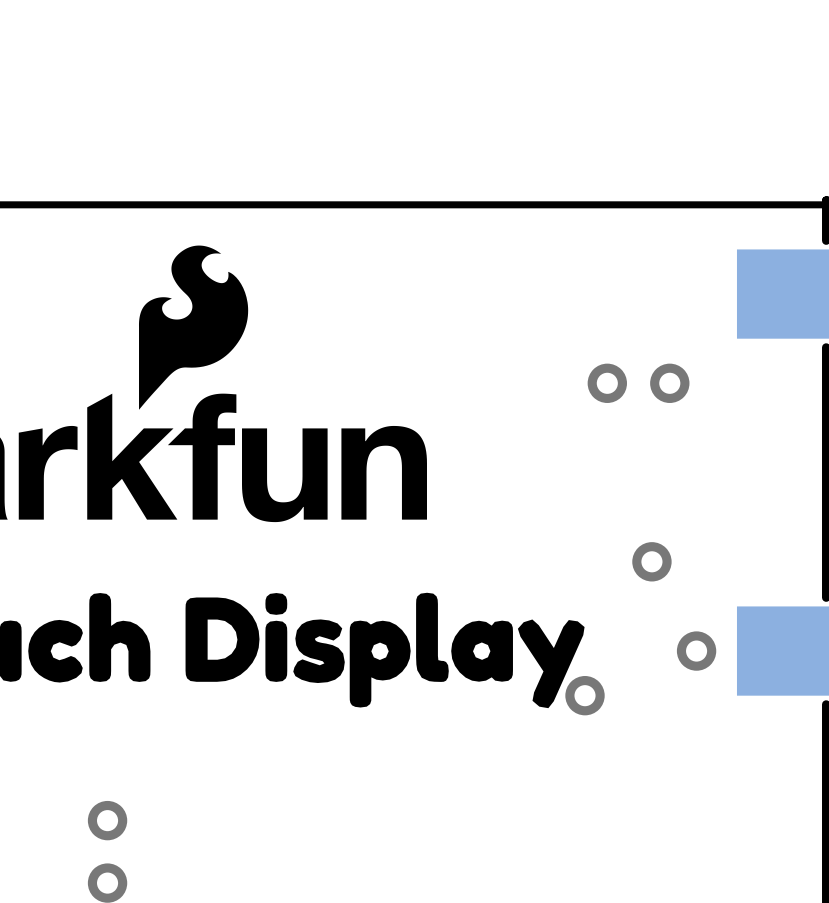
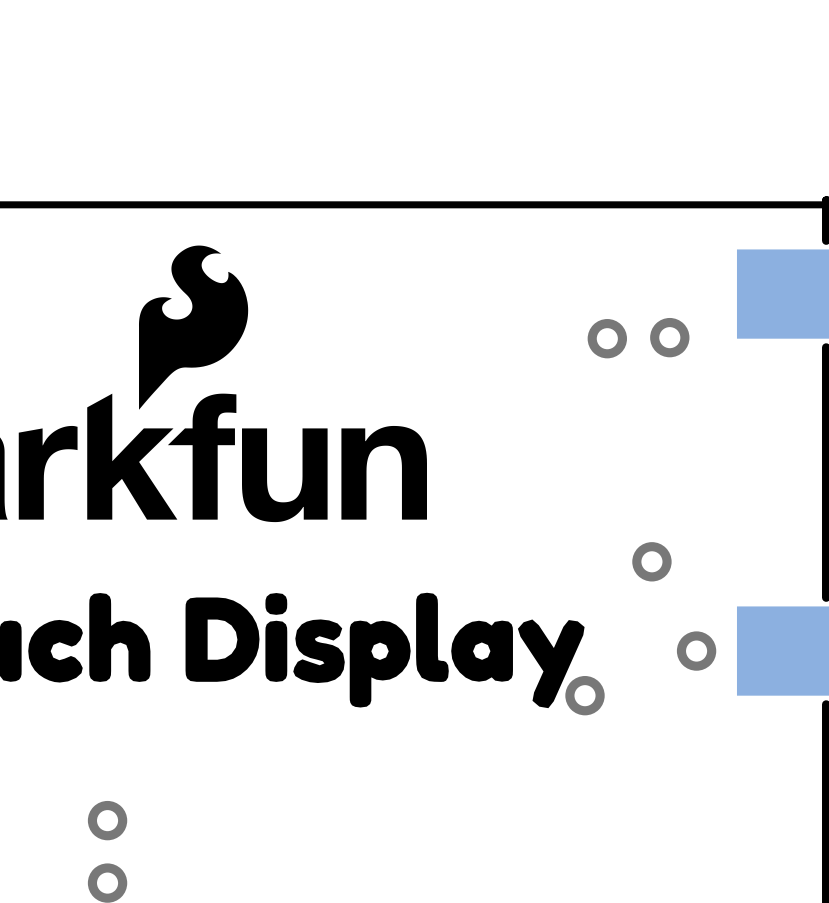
via: none -> (669, 337)
via: none -> (607, 338)
via: (607, 383) -> none
via: (669, 383) -> none

